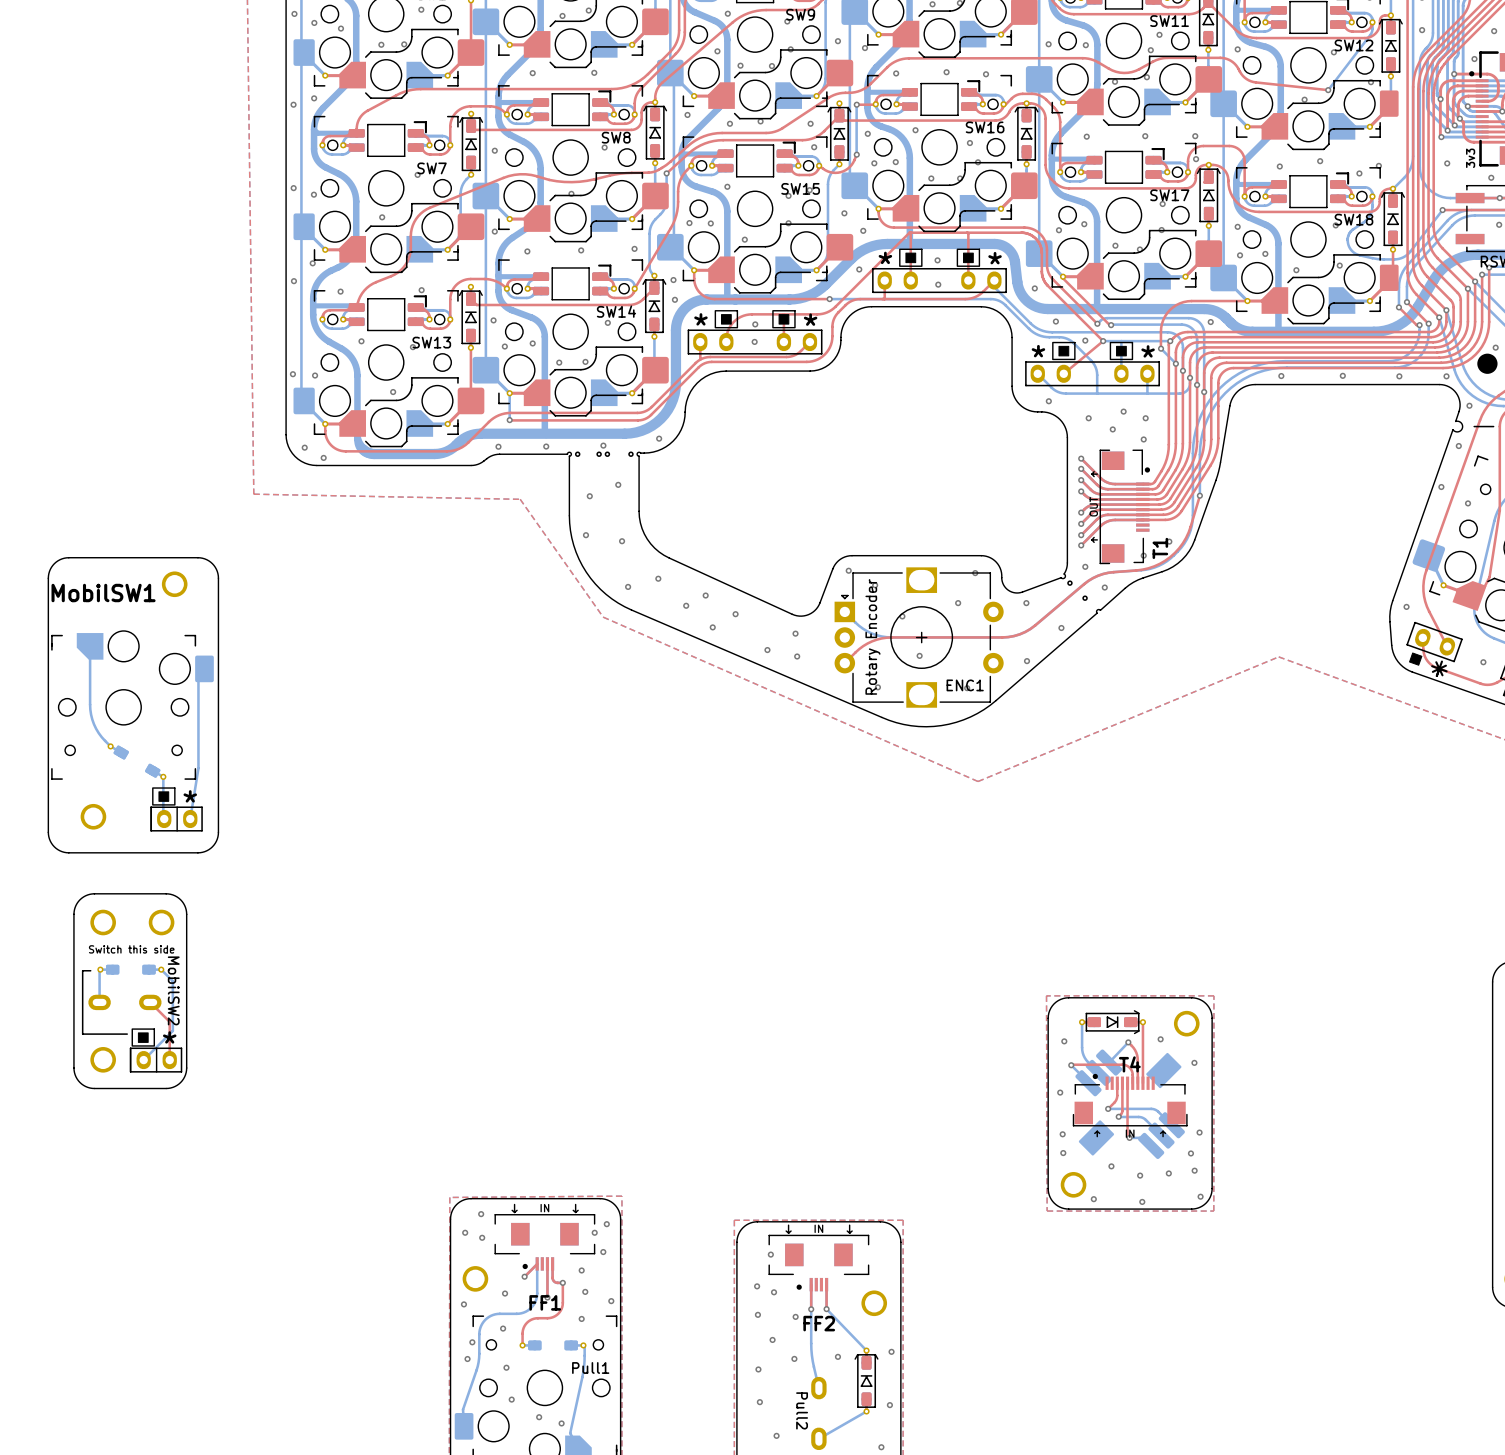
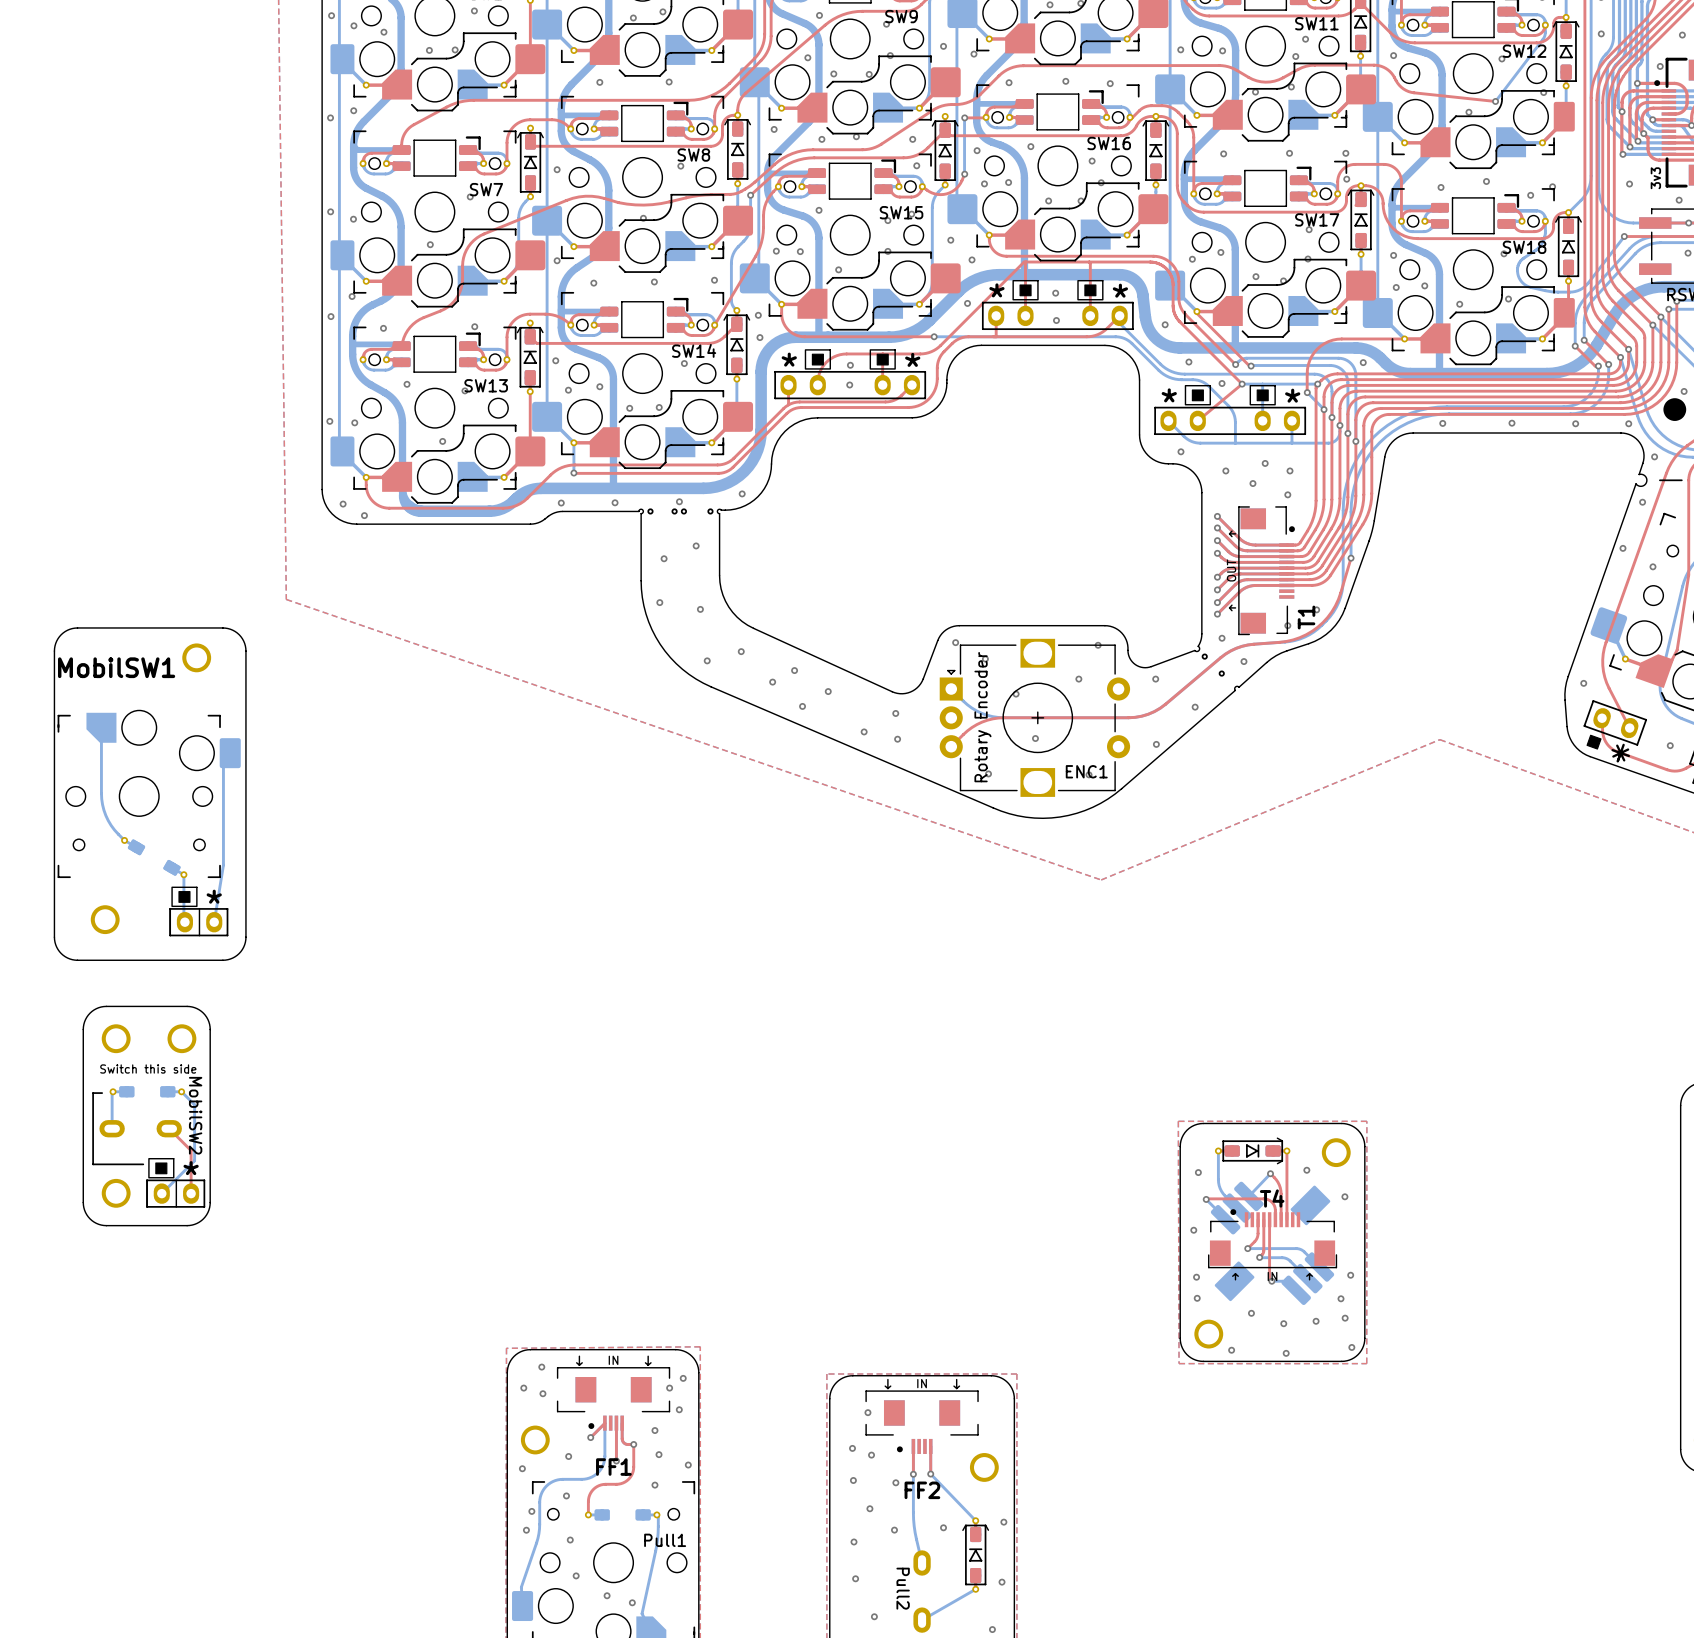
top zone outline: (253, 494) (520, 499) (603, 617) (978, 781) -> (285, 556) (286, 599) (1101, 879)

